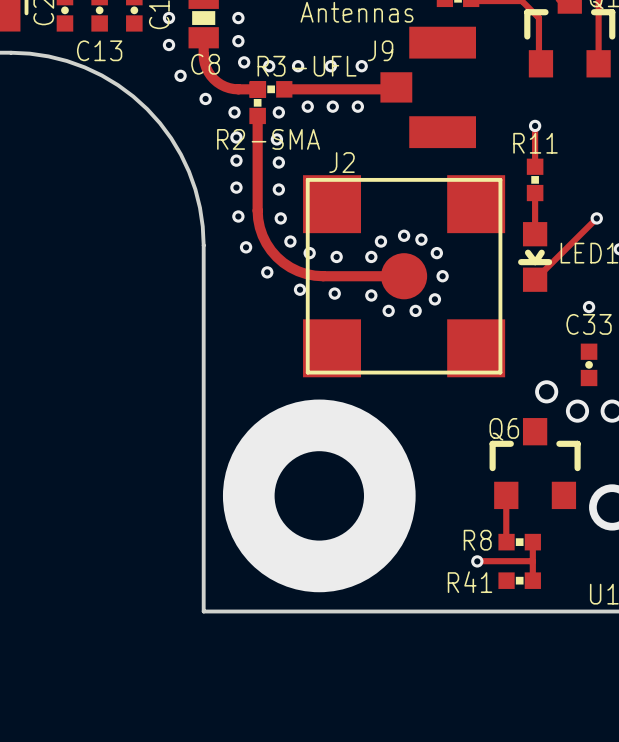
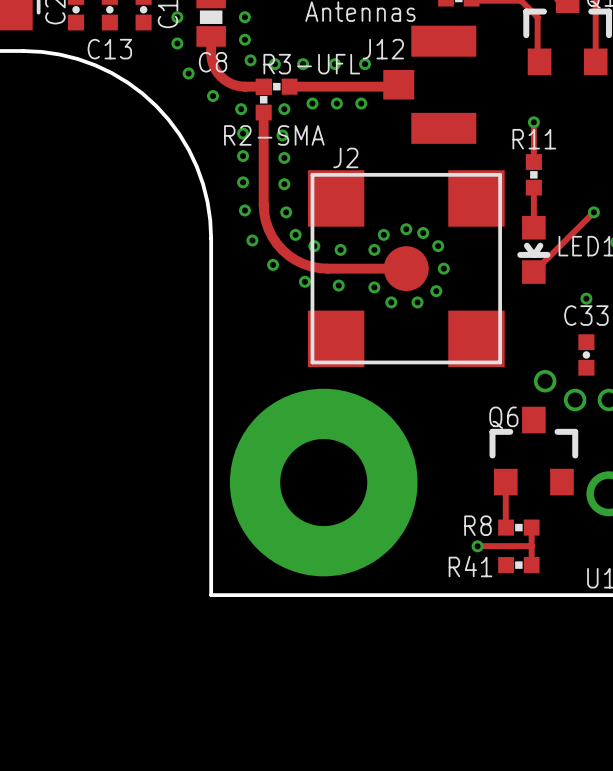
J9 name: J9 (380, 50) -> J12 (383, 49)

